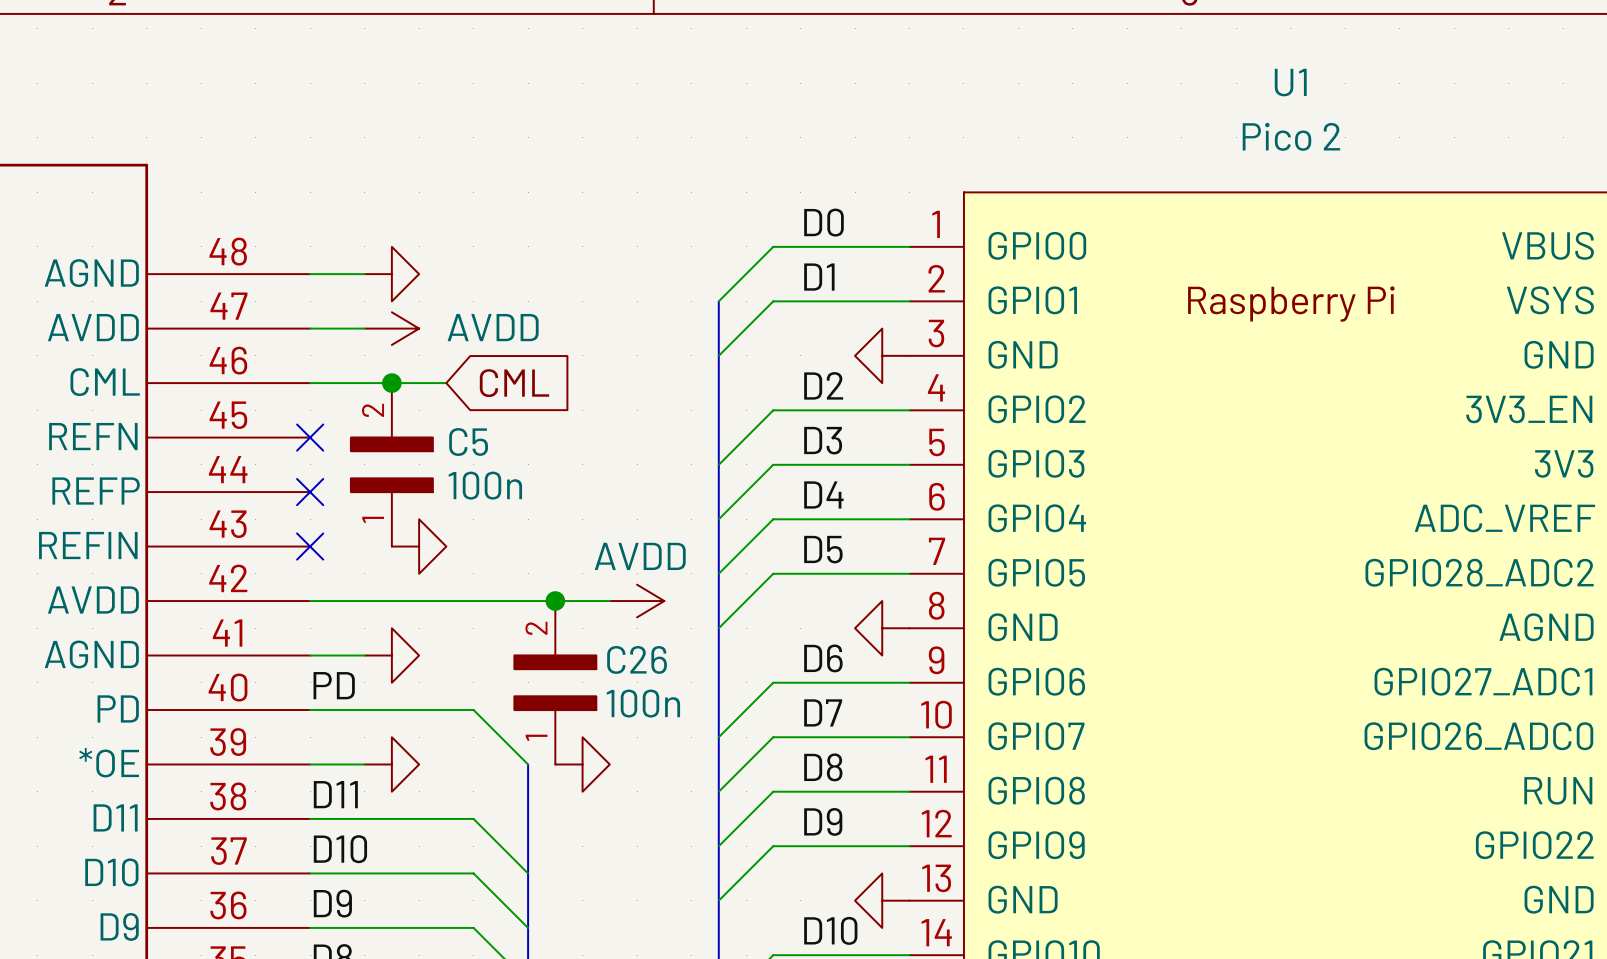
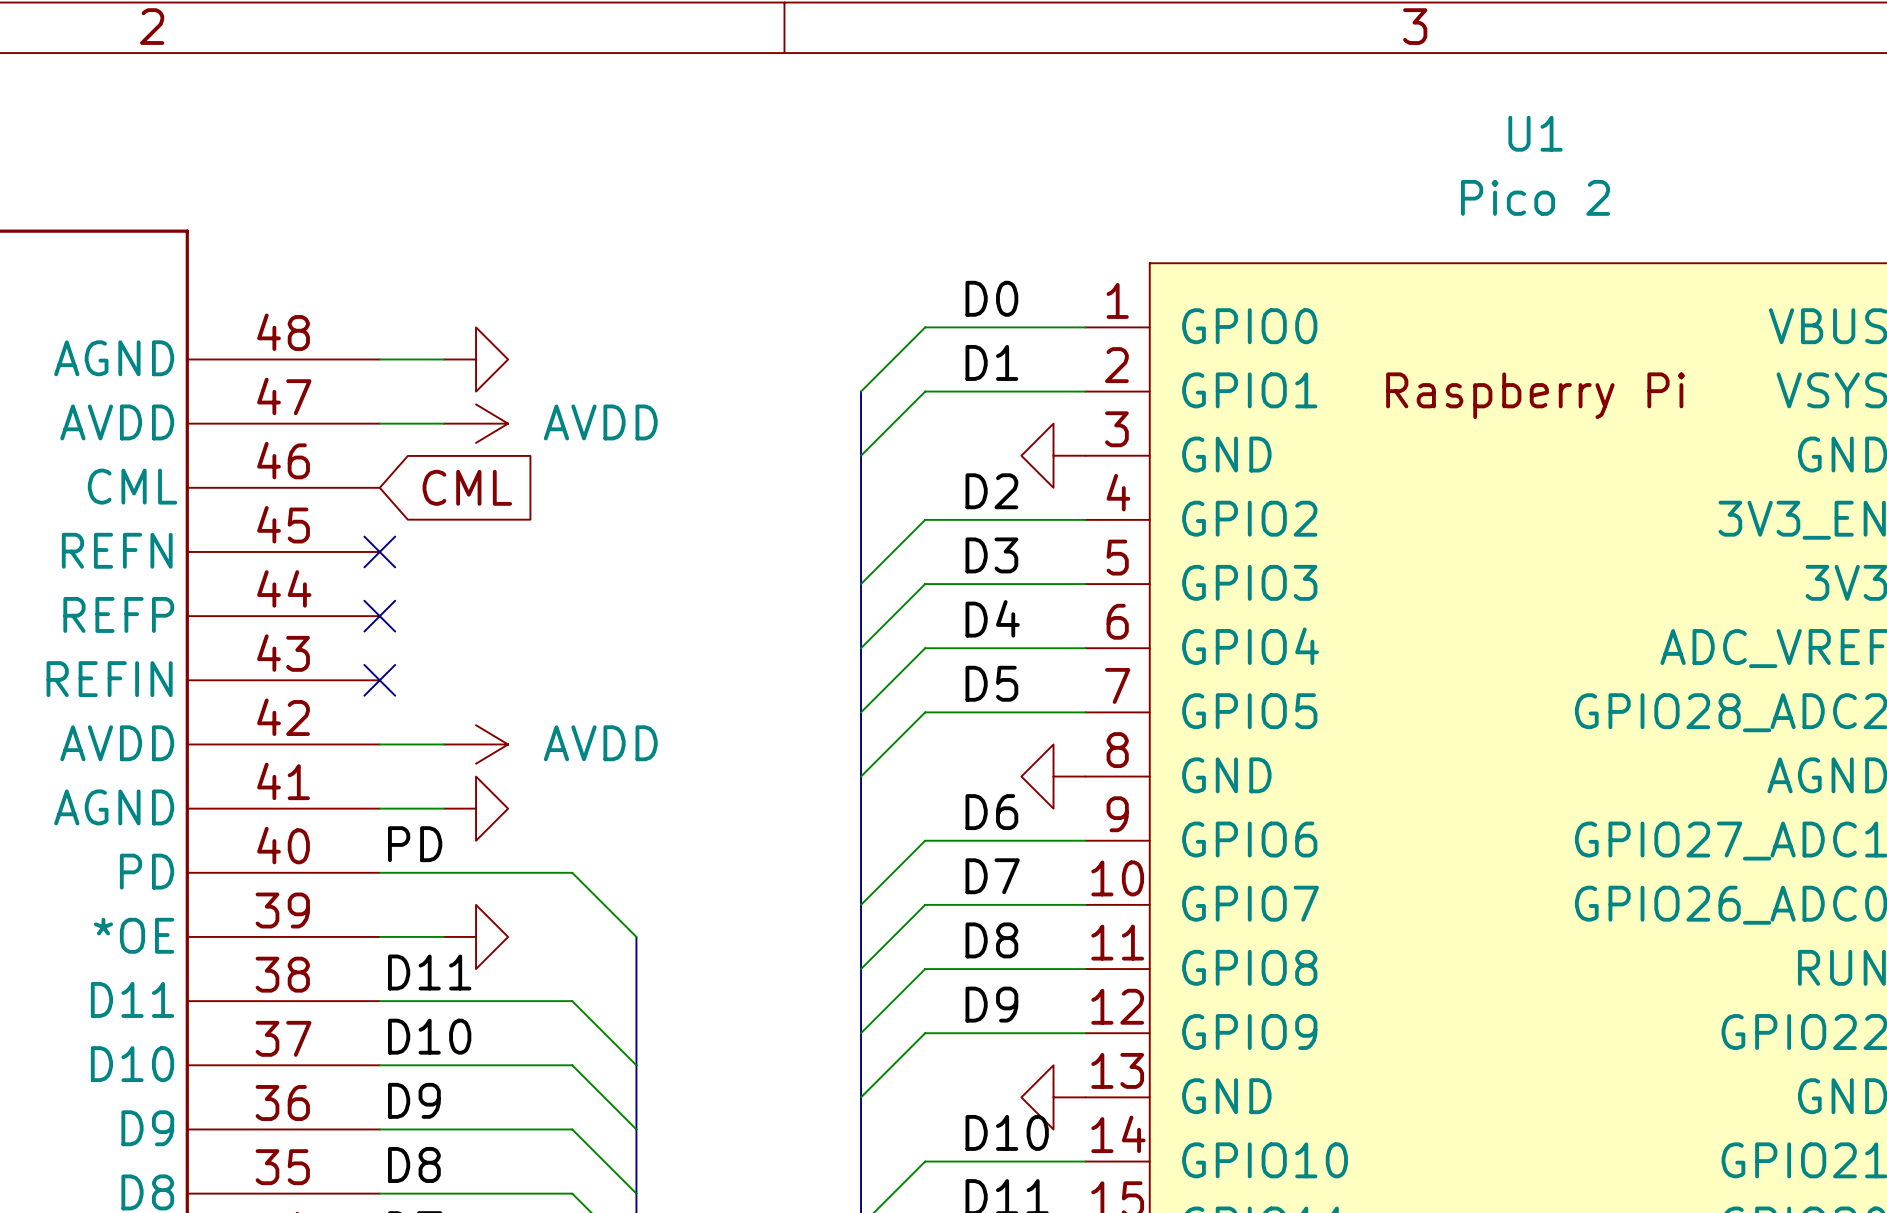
wire: (310, 383) (446, 383) -> none
junction: (391, 383) -> none
global label position: CML (514, 383) -> CML (467, 487)
C5: 100n (391, 464) -> none
power symbol: (419, 546) -> none
power symbol text position: AVDD (640, 556) -> AVDD (600, 743)
wire: (364, 601) (609, 601) -> none
junction: (555, 601) -> none
power symbol position: AVDD (637, 601) -> AVDD (476, 744)
C26: 100n (555, 682) -> none
power symbol: (582, 764) -> none

